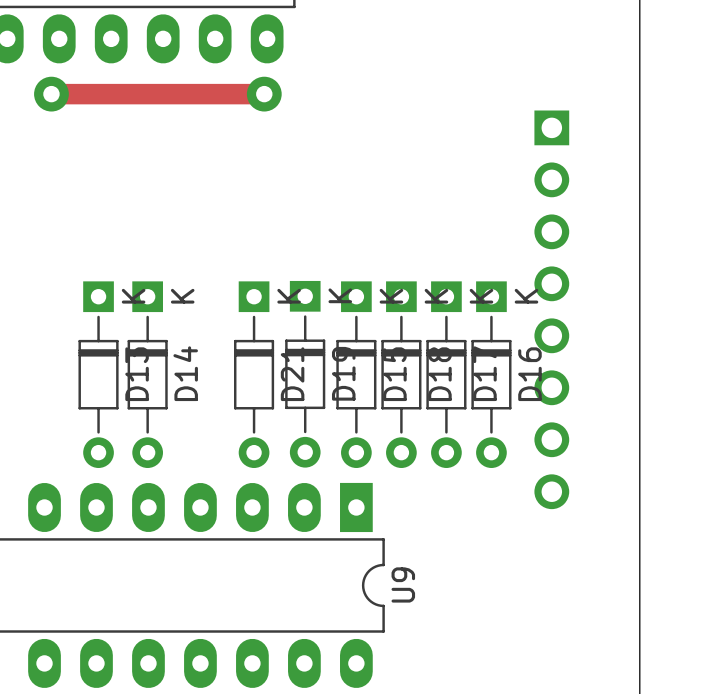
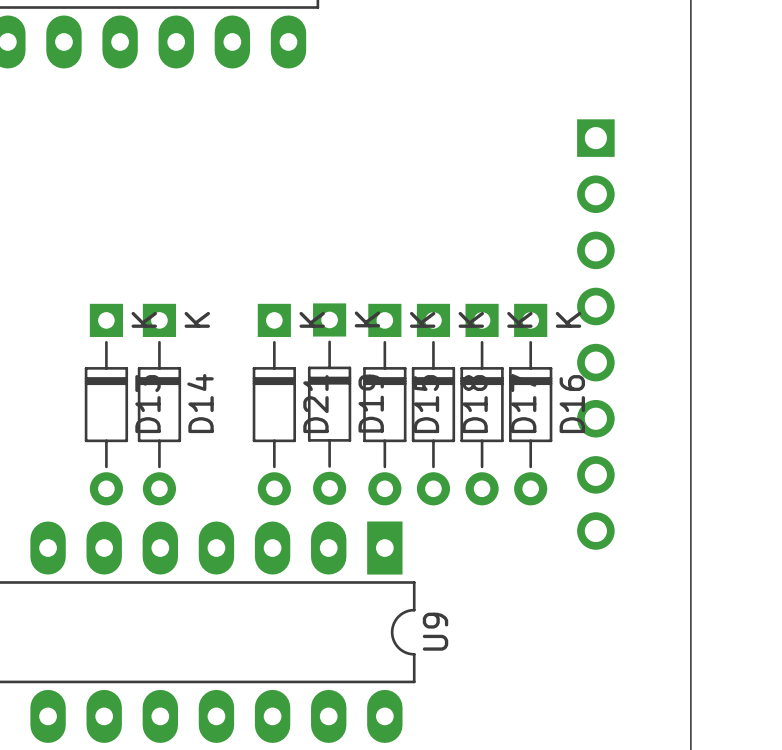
track: (51, 94) (264, 94) -> none
via: (51, 94) -> none
via: (264, 94) -> none

